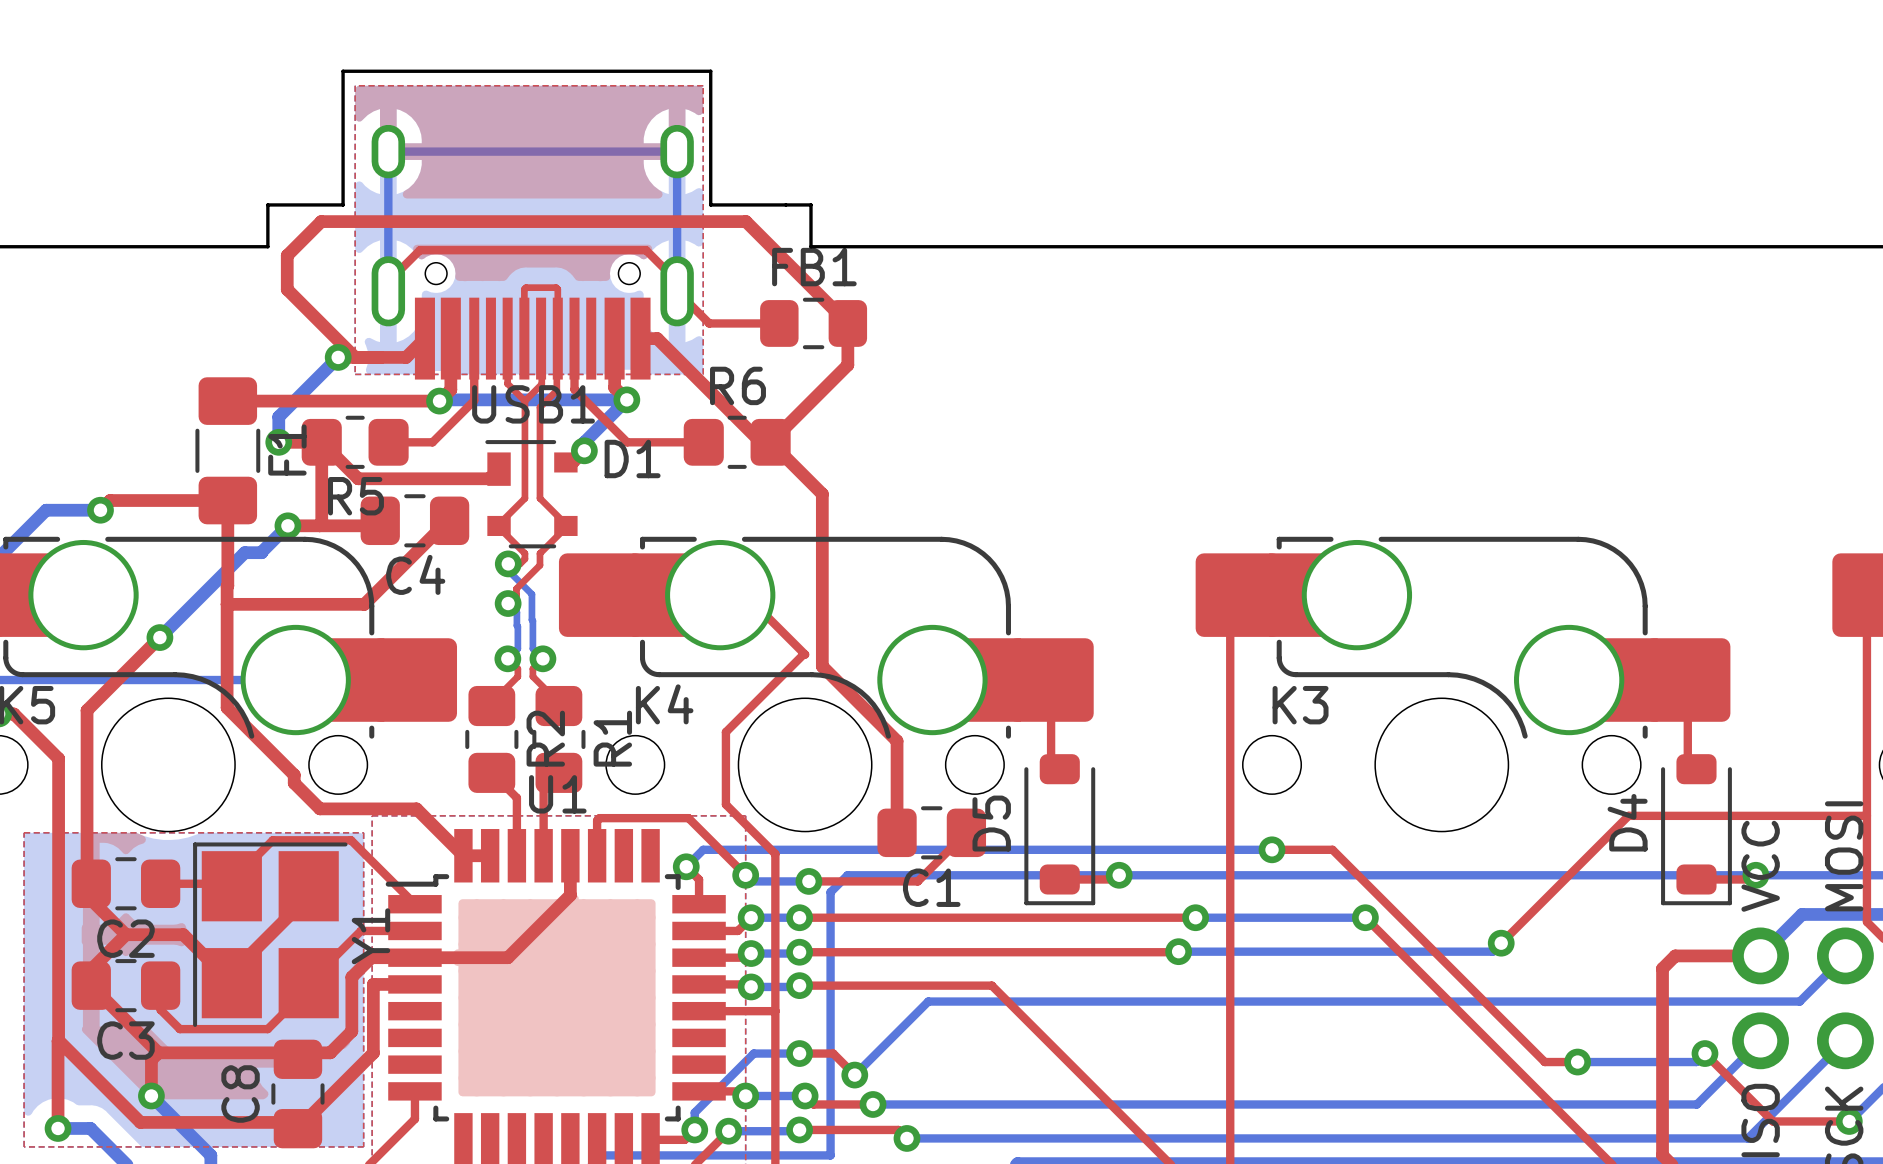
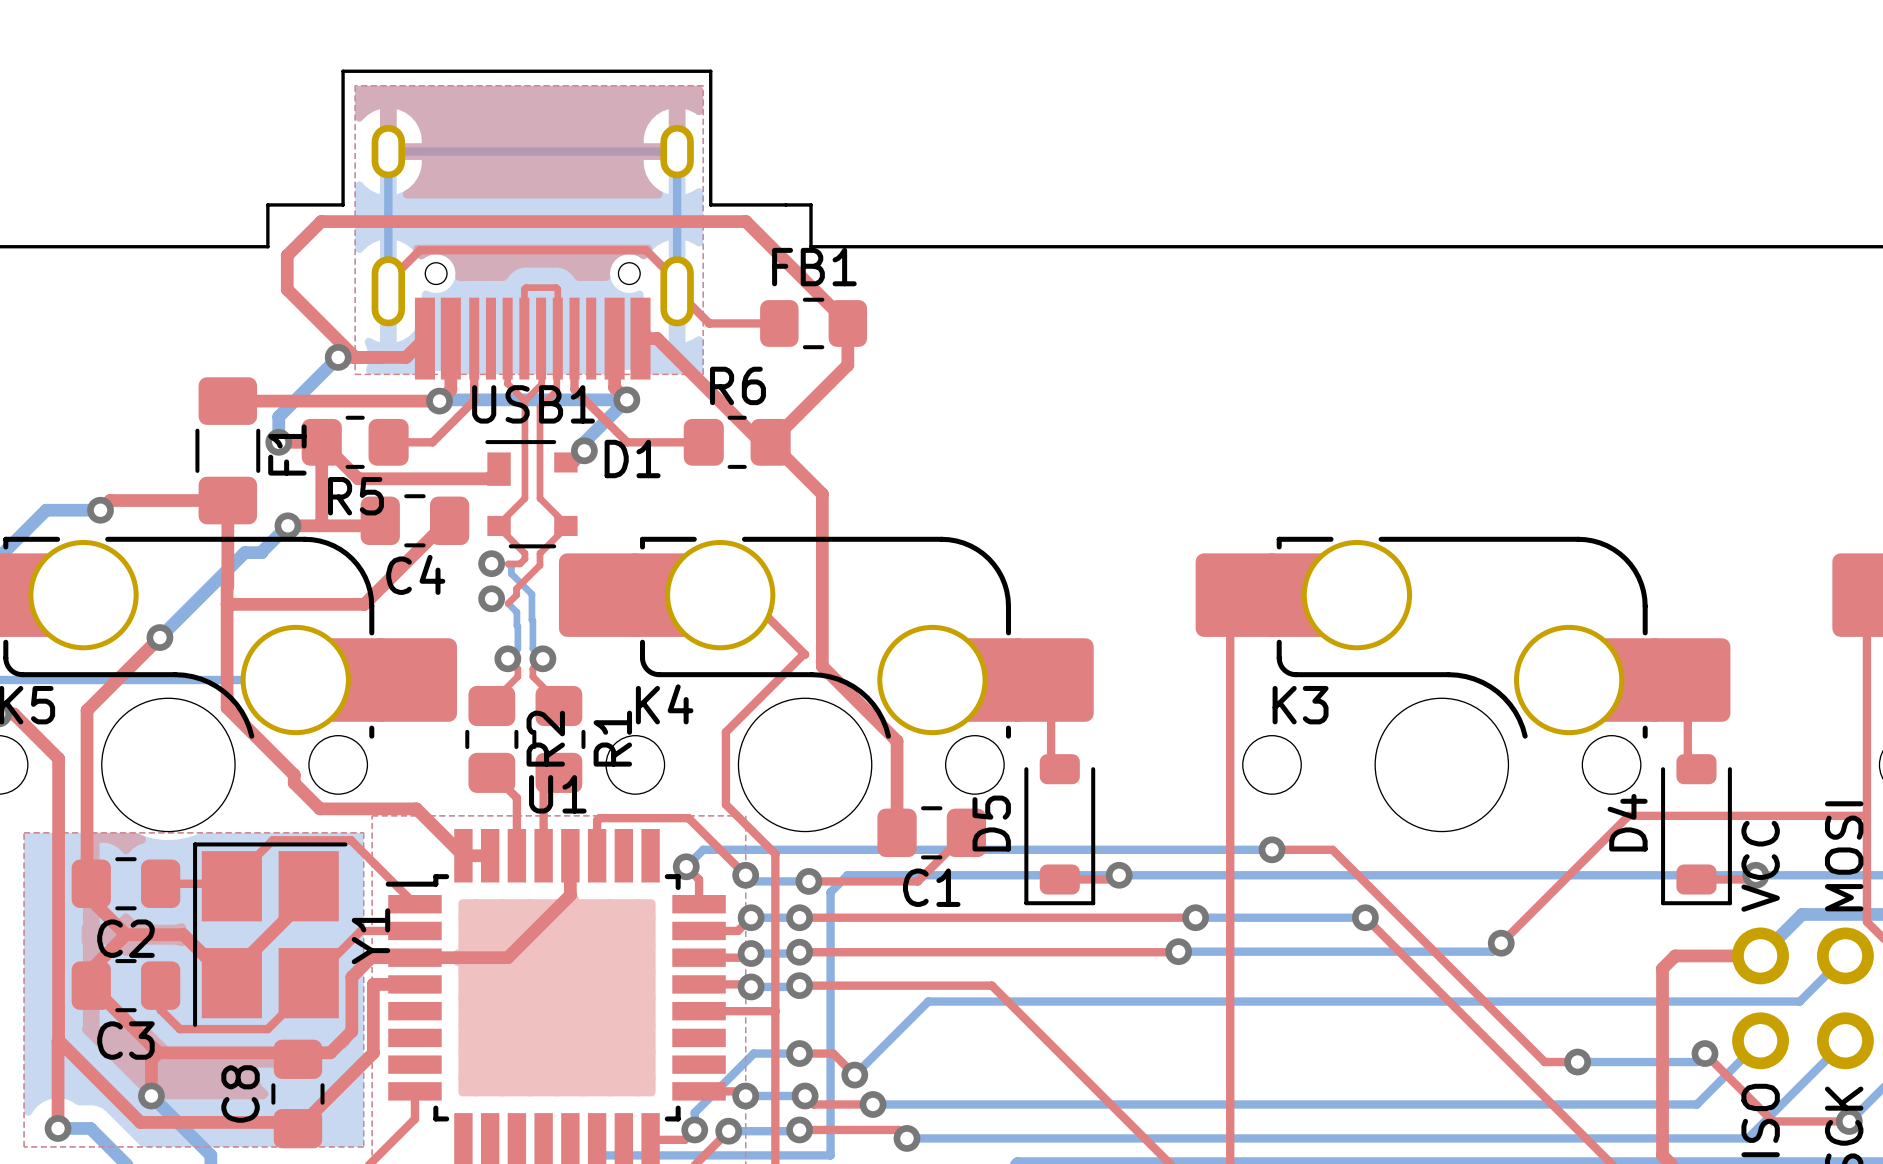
via position: (508, 563) -> (491, 563)
via position: (508, 603) -> (491, 598)

